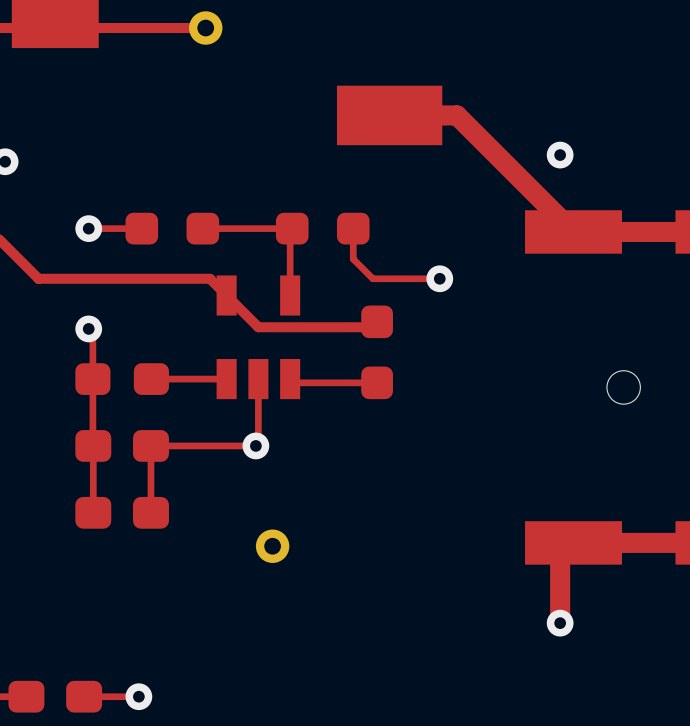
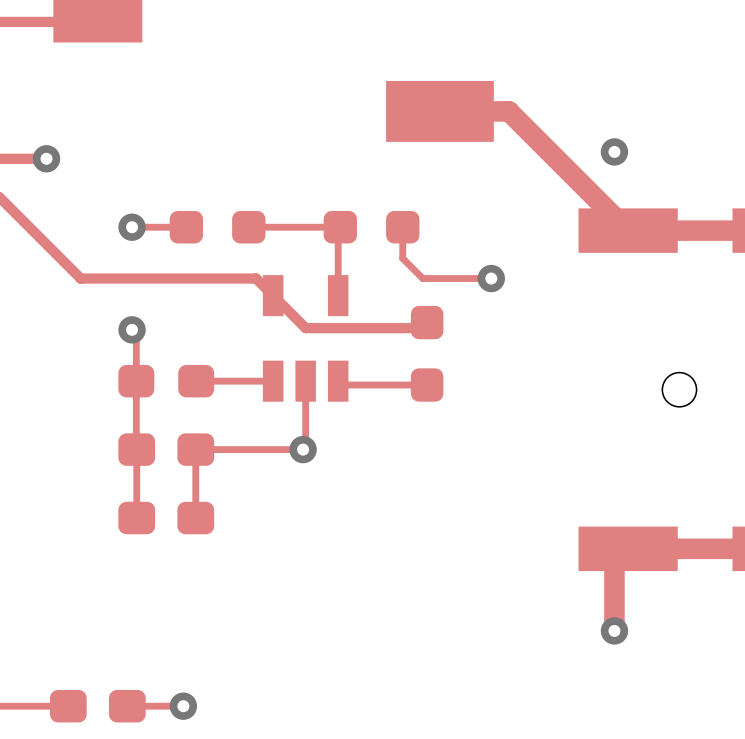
top track: (205, 28) (63, 28) -> none
part: (205, 28) -> none
part: (272, 546) -> none

